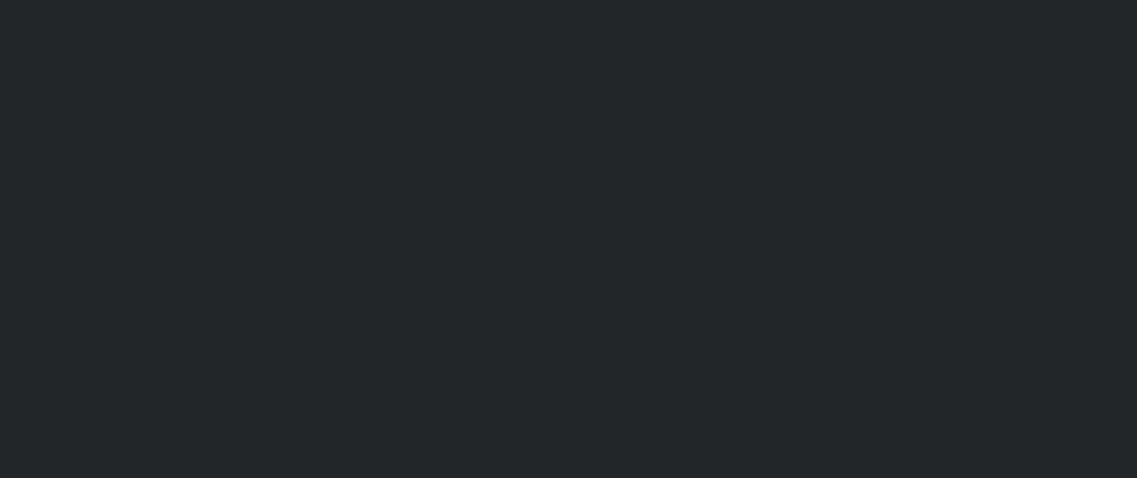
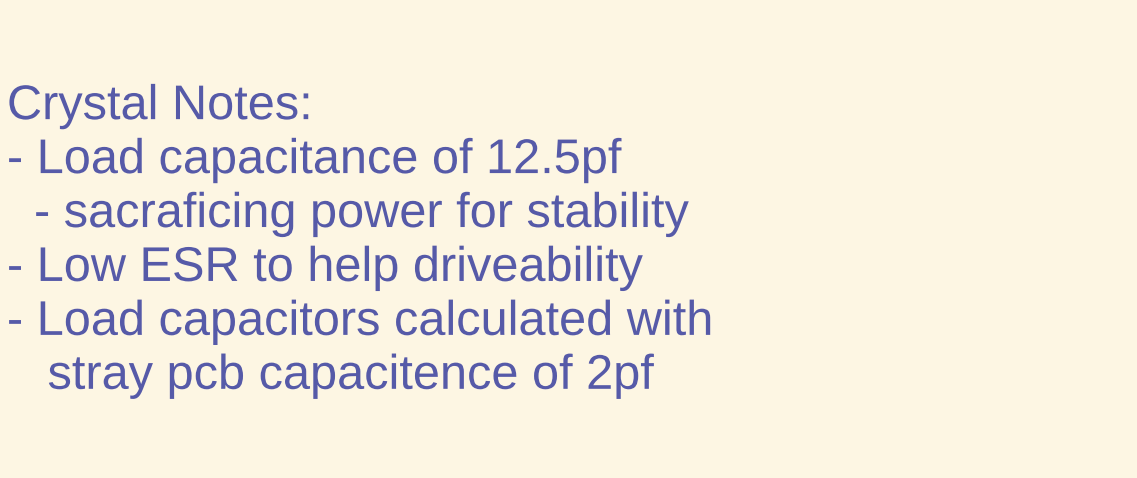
text: none -> Crystal Notes: (158, 106)
text: none -> - Load capacitance of 12.5pf (315, 160)
text: none -> - sacraficing power for stability (362, 214)
text: none -> - Low ESR to help driveability (325, 268)
text: none -> - Load capacitors calculated with (359, 322)
text: none -> stray pcb capacitence of 2pf (351, 376)

